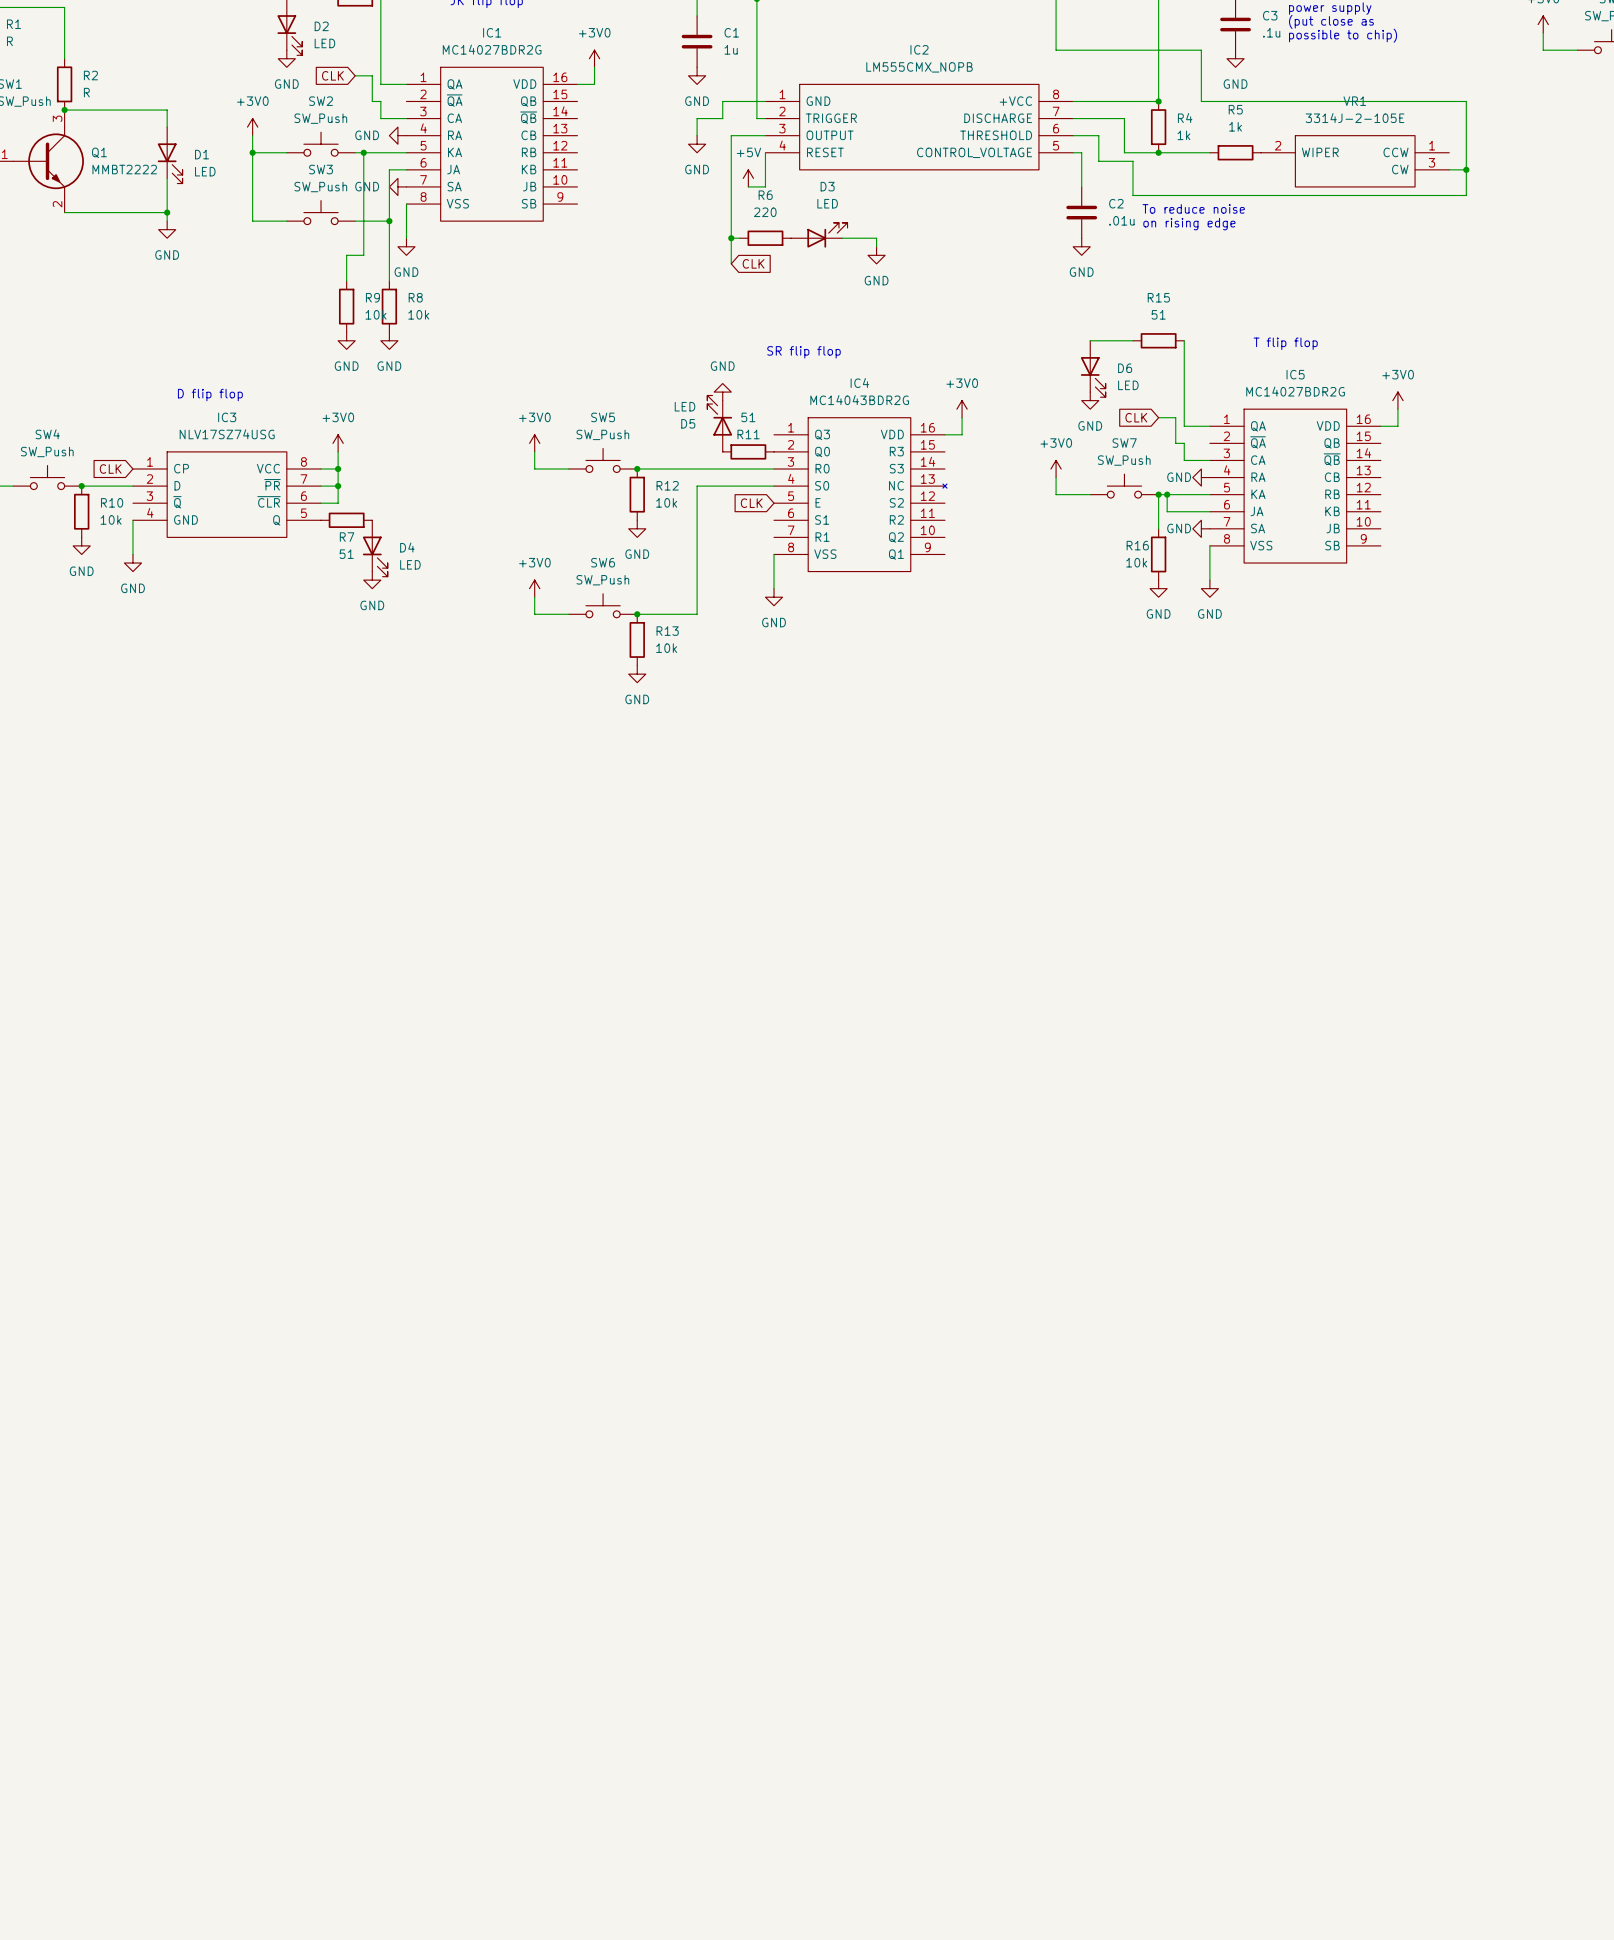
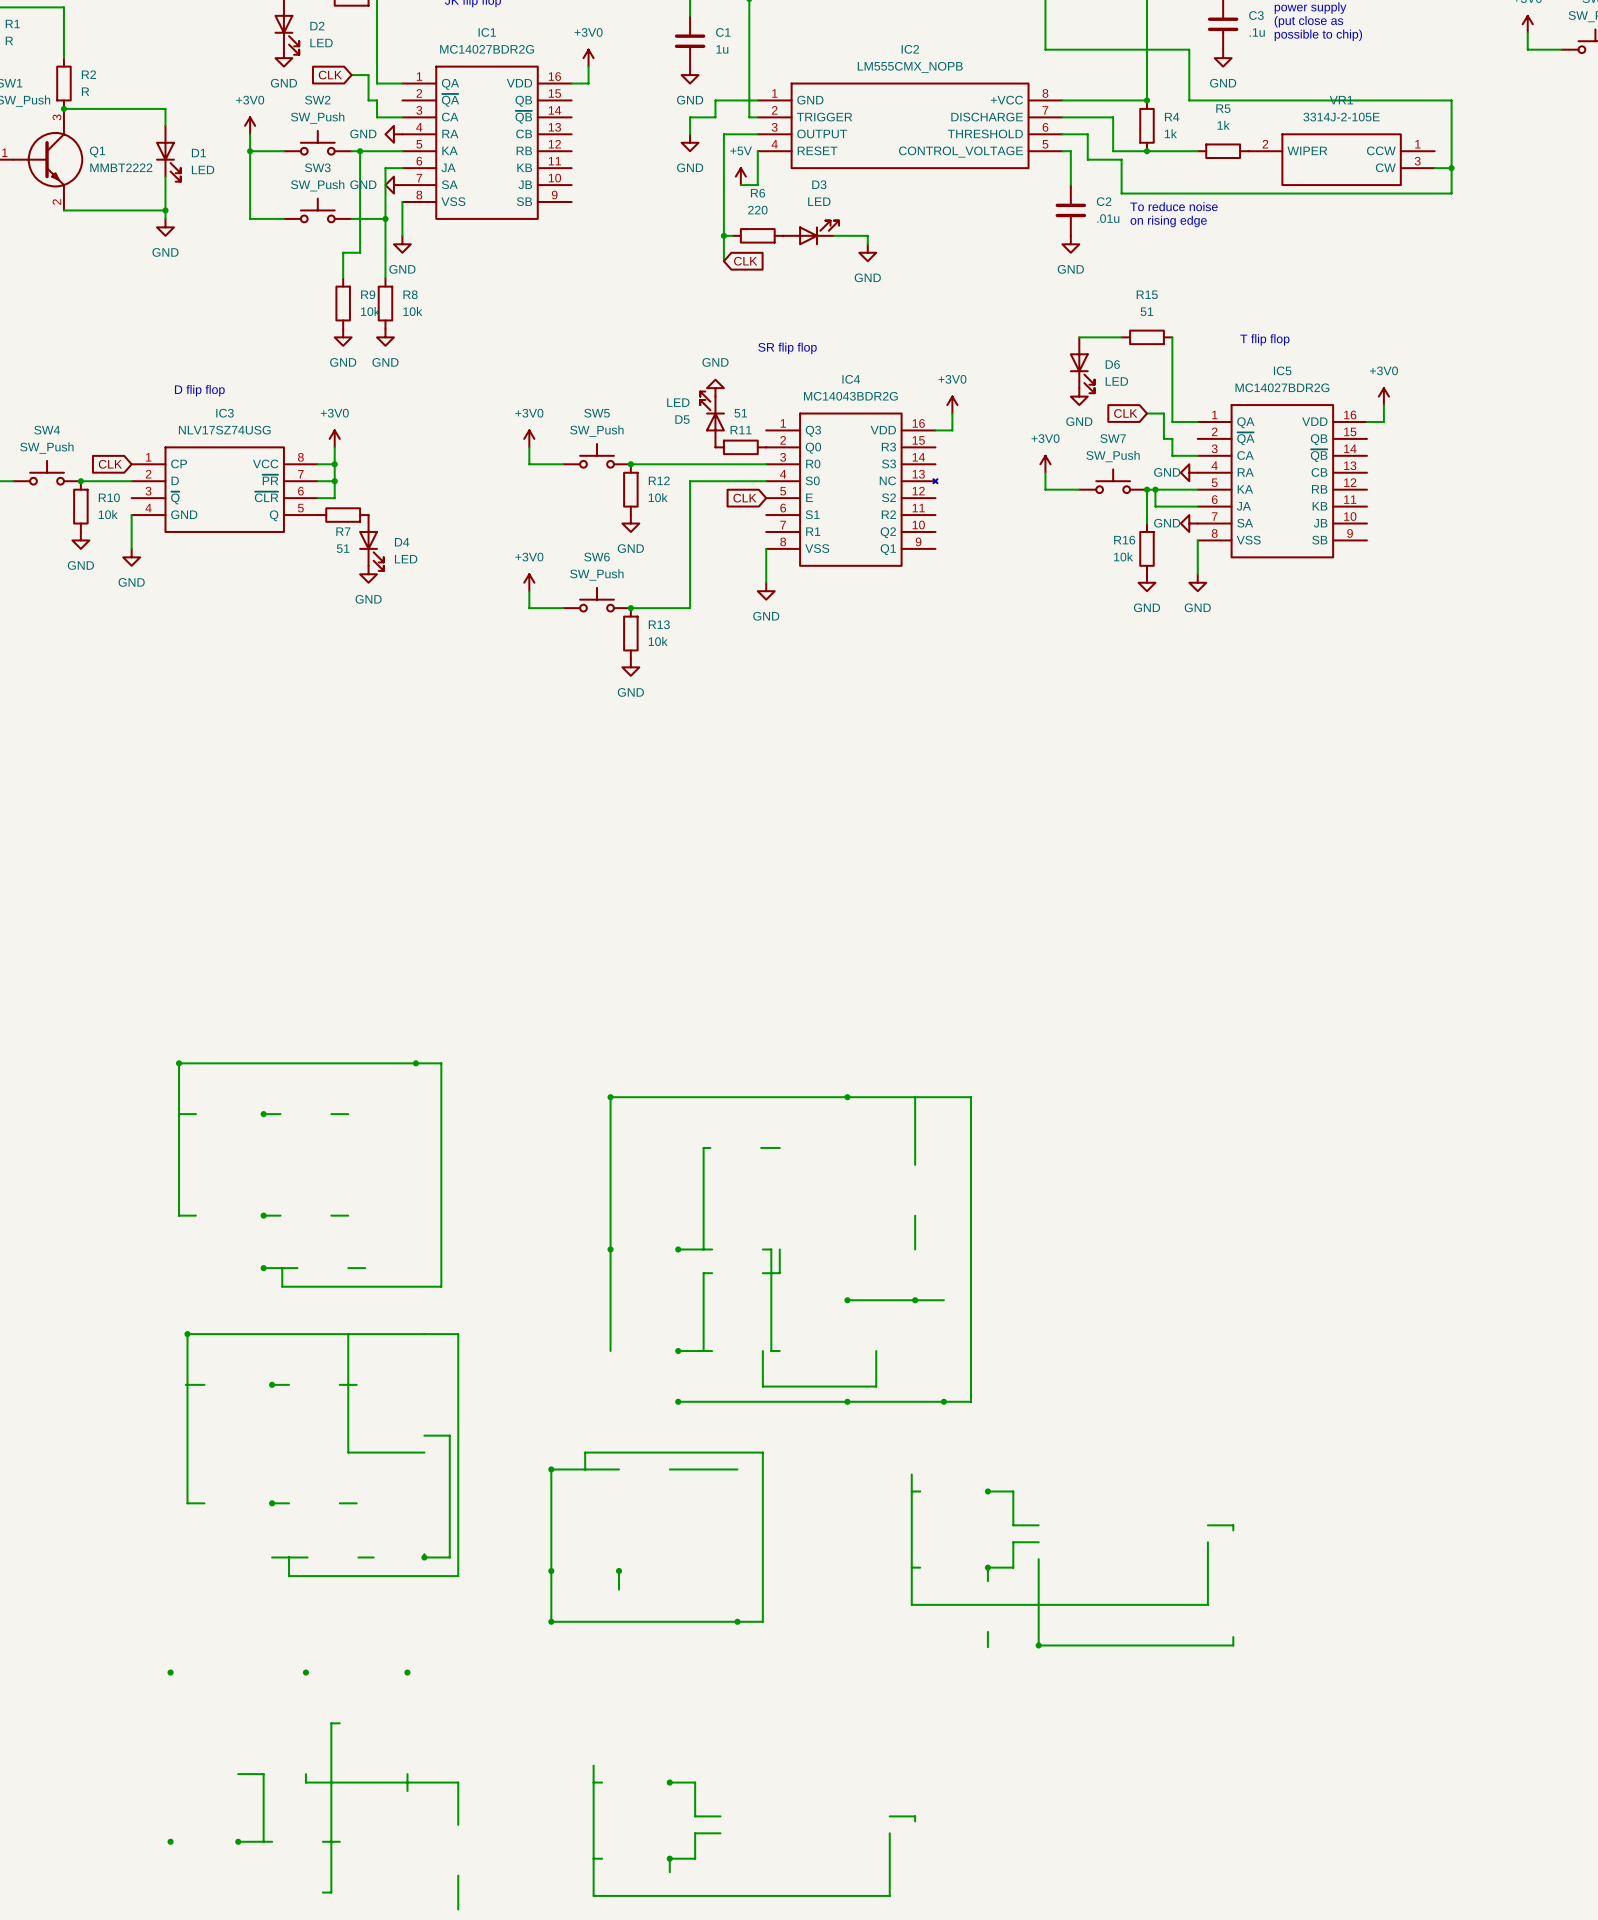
junction: none -> (179, 1063)
junction: none -> (415, 1063)
junction: none -> (610, 1097)
junction: none -> (847, 1097)
wire: none -> (915, 1097) (915, 1164)
wire: none -> (179, 1114) (195, 1114)
wire: none -> (263, 1114) (280, 1114)
junction: none -> (263, 1114)
wire: none -> (331, 1114) (348, 1114)
wire: none -> (710, 1147) (703, 1147) (703, 1249)
wire: none -> (761, 1147) (779, 1147)
wire: none -> (195, 1215) (179, 1215) (179, 1063) (441, 1063) (441, 1286) (282, 1286) (282, 1268)
wire: none -> (263, 1215) (280, 1215)
junction: none -> (263, 1215)
wire: none -> (331, 1215) (348, 1215)
wire: none -> (915, 1215) (915, 1249)
junction: none -> (610, 1249)
wire: none -> (678, 1249) (712, 1249)
junction: none -> (678, 1249)
wire: none -> (762, 1249) (771, 1249) (771, 1351) (779, 1351)
wire: none -> (779, 1249) (779, 1273) (762, 1273)
wire: none -> (263, 1268) (297, 1268)
junction: none -> (263, 1268)
wire: none -> (348, 1268) (365, 1268)
wire: none -> (712, 1273) (703, 1273) (703, 1351)
wire: none -> (847, 1300) (943, 1300)
junction: none -> (847, 1300)
junction: none -> (915, 1300)
junction: none -> (187, 1334)
wire: none -> (348, 1334) (348, 1452) (424, 1452)
wire: none -> (610, 1351) (610, 1097) (971, 1097) (971, 1401) (678, 1401)
wire: none -> (678, 1351) (712, 1351)
junction: none -> (678, 1351)
wire: none -> (762, 1351) (762, 1386) (876, 1386) (876, 1351)
wire: none -> (185, 1384) (204, 1384)
wire: none -> (272, 1384) (289, 1384)
junction: none -> (272, 1384)
wire: none -> (339, 1384) (356, 1384)
junction: none -> (678, 1401)
junction: none -> (847, 1401)
junction: none -> (943, 1401)
wire: none -> (424, 1435) (449, 1435) (449, 1557) (424, 1557) (424, 1554)
junction: none -> (551, 1469)
wire: none -> (585, 1469) (585, 1452) (762, 1452) (762, 1621) (551, 1621) (551, 1469) (619, 1469)
wire: none -> (669, 1469) (737, 1469)
wire: none -> (911, 1474) (911, 1604) (1207, 1604) (1207, 1542)
wire: none -> (911, 1491) (920, 1491)
wire: none -> (987, 1491) (1013, 1491) (1013, 1525) (1038, 1525)
junction: none -> (987, 1491)
wire: none -> (204, 1503) (187, 1503) (187, 1334) (458, 1334) (458, 1576) (289, 1576) (289, 1557)
wire: none -> (272, 1503) (289, 1503)
junction: none -> (272, 1503)
wire: none -> (339, 1503) (356, 1503)
wire: none -> (1207, 1525) (1233, 1525) (1233, 1530)
wire: none -> (1038, 1542) (1013, 1542) (1013, 1567) (987, 1567) (987, 1581)
wire: none -> (272, 1557) (307, 1557)
wire: none -> (358, 1557) (373, 1557)
junction: none -> (424, 1557)
wire: none -> (1038, 1559) (1038, 1647)
wire: none -> (911, 1567) (920, 1567)
junction: none -> (987, 1567)
junction: none -> (551, 1571)
wire: none -> (619, 1571) (619, 1589)
junction: none -> (619, 1571)
junction: none -> (551, 1621)
junction: none -> (737, 1621)
wire: none -> (987, 1631) (987, 1647)
wire: none -> (1233, 1637) (1233, 1645) (1038, 1645)
junction: none -> (1038, 1645)
junction: none -> (170, 1672)
junction: none -> (305, 1672)
junction: none -> (407, 1672)
wire: none -> (339, 1723) (331, 1723) (331, 1892) (322, 1892)
wire: none -> (593, 1765) (593, 1895) (889, 1895) (889, 1833)
wire: none -> (238, 1774) (263, 1774) (263, 1841)
wire: none -> (305, 1774) (305, 1782) (458, 1782) (458, 1824)
wire: none -> (407, 1774) (407, 1791)
wire: none -> (593, 1782) (602, 1782)
wire: none -> (669, 1782) (695, 1782) (695, 1816) (720, 1816)
junction: none -> (669, 1782)
wire: none -> (889, 1816) (915, 1816) (915, 1821)
wire: none -> (720, 1833) (695, 1833) (695, 1858) (669, 1858) (669, 1872)
junction: none -> (170, 1841)
wire: none -> (238, 1841) (272, 1841)
junction: none -> (238, 1841)
wire: none -> (322, 1841) (339, 1841)
wire: none -> (593, 1858) (602, 1858)
junction: none -> (669, 1858)
wire: none -> (458, 1875) (458, 1909)

